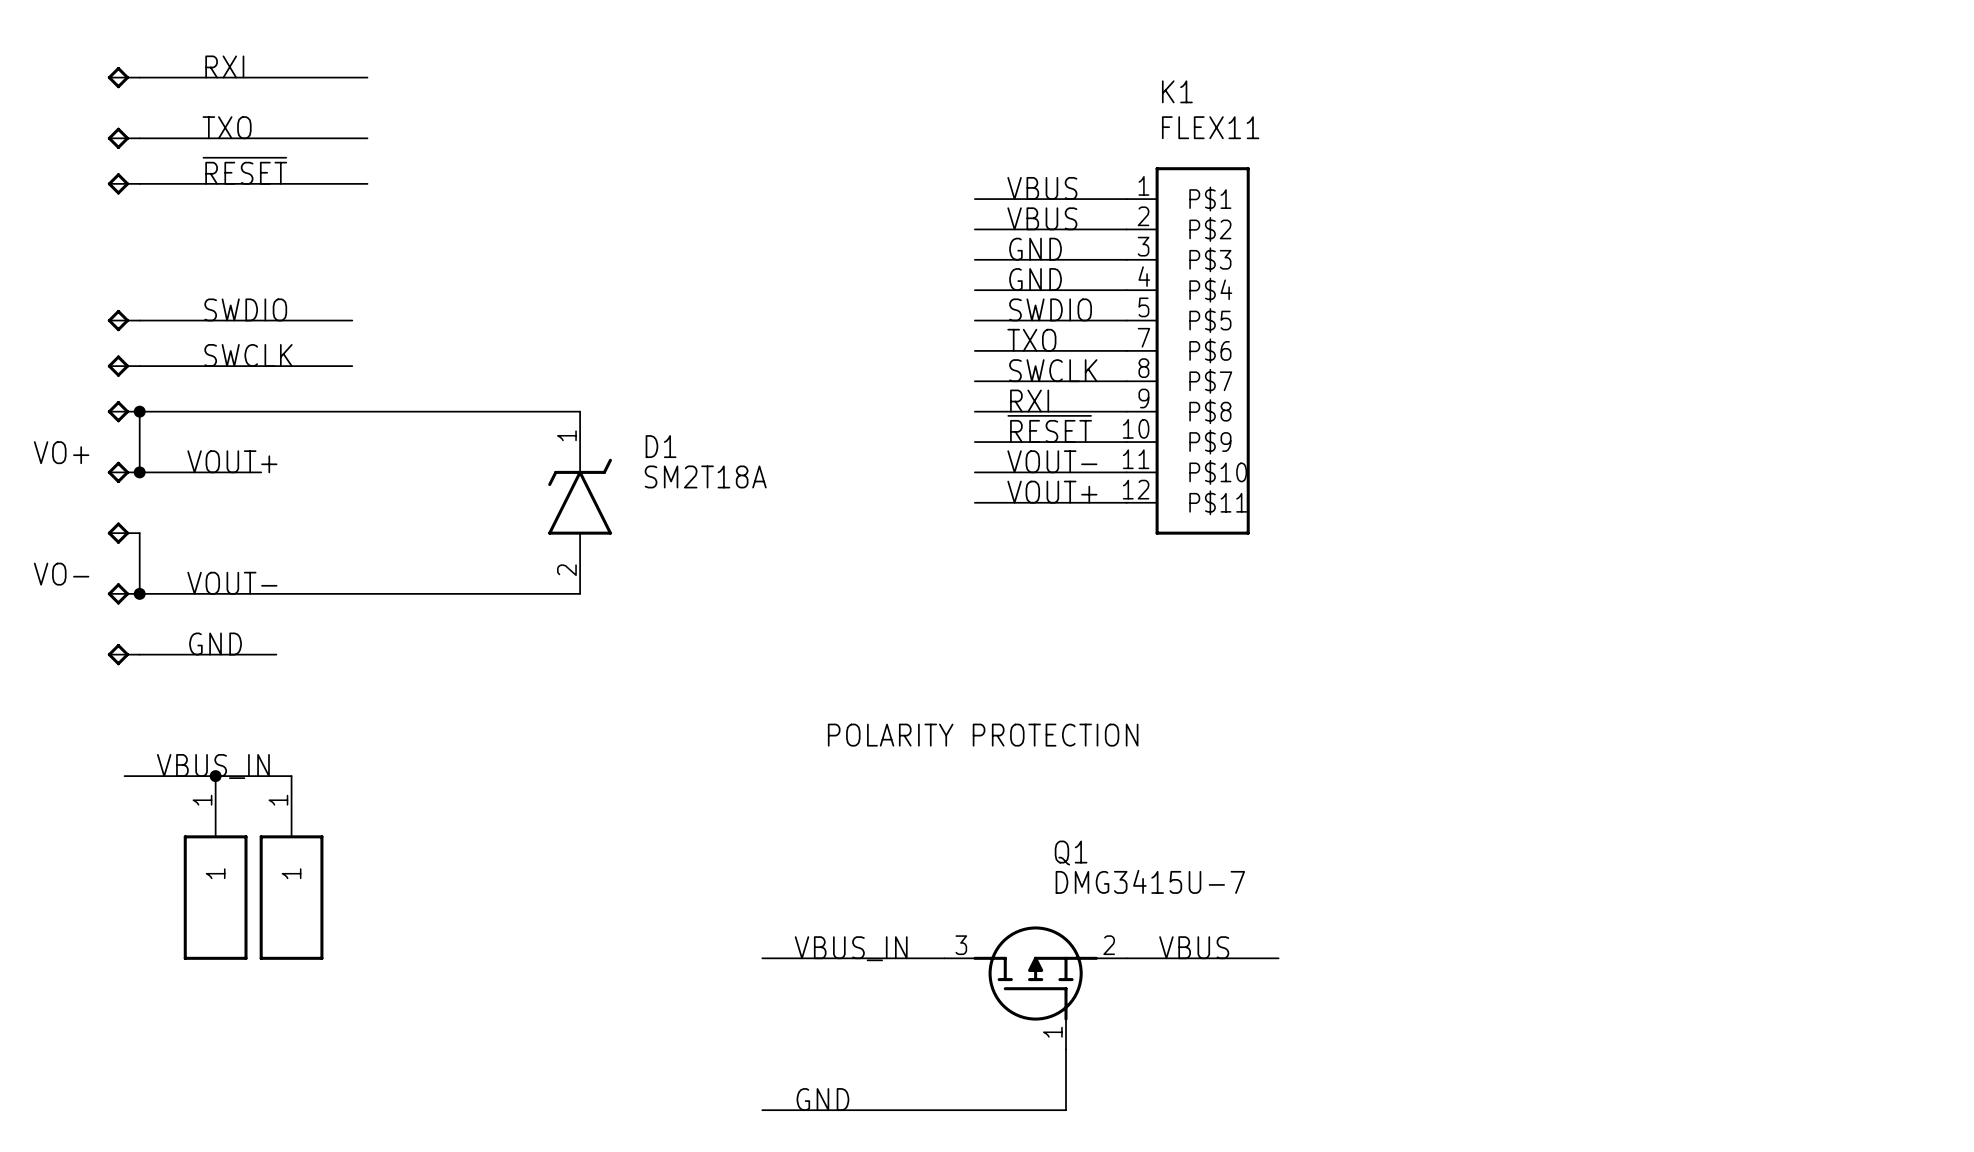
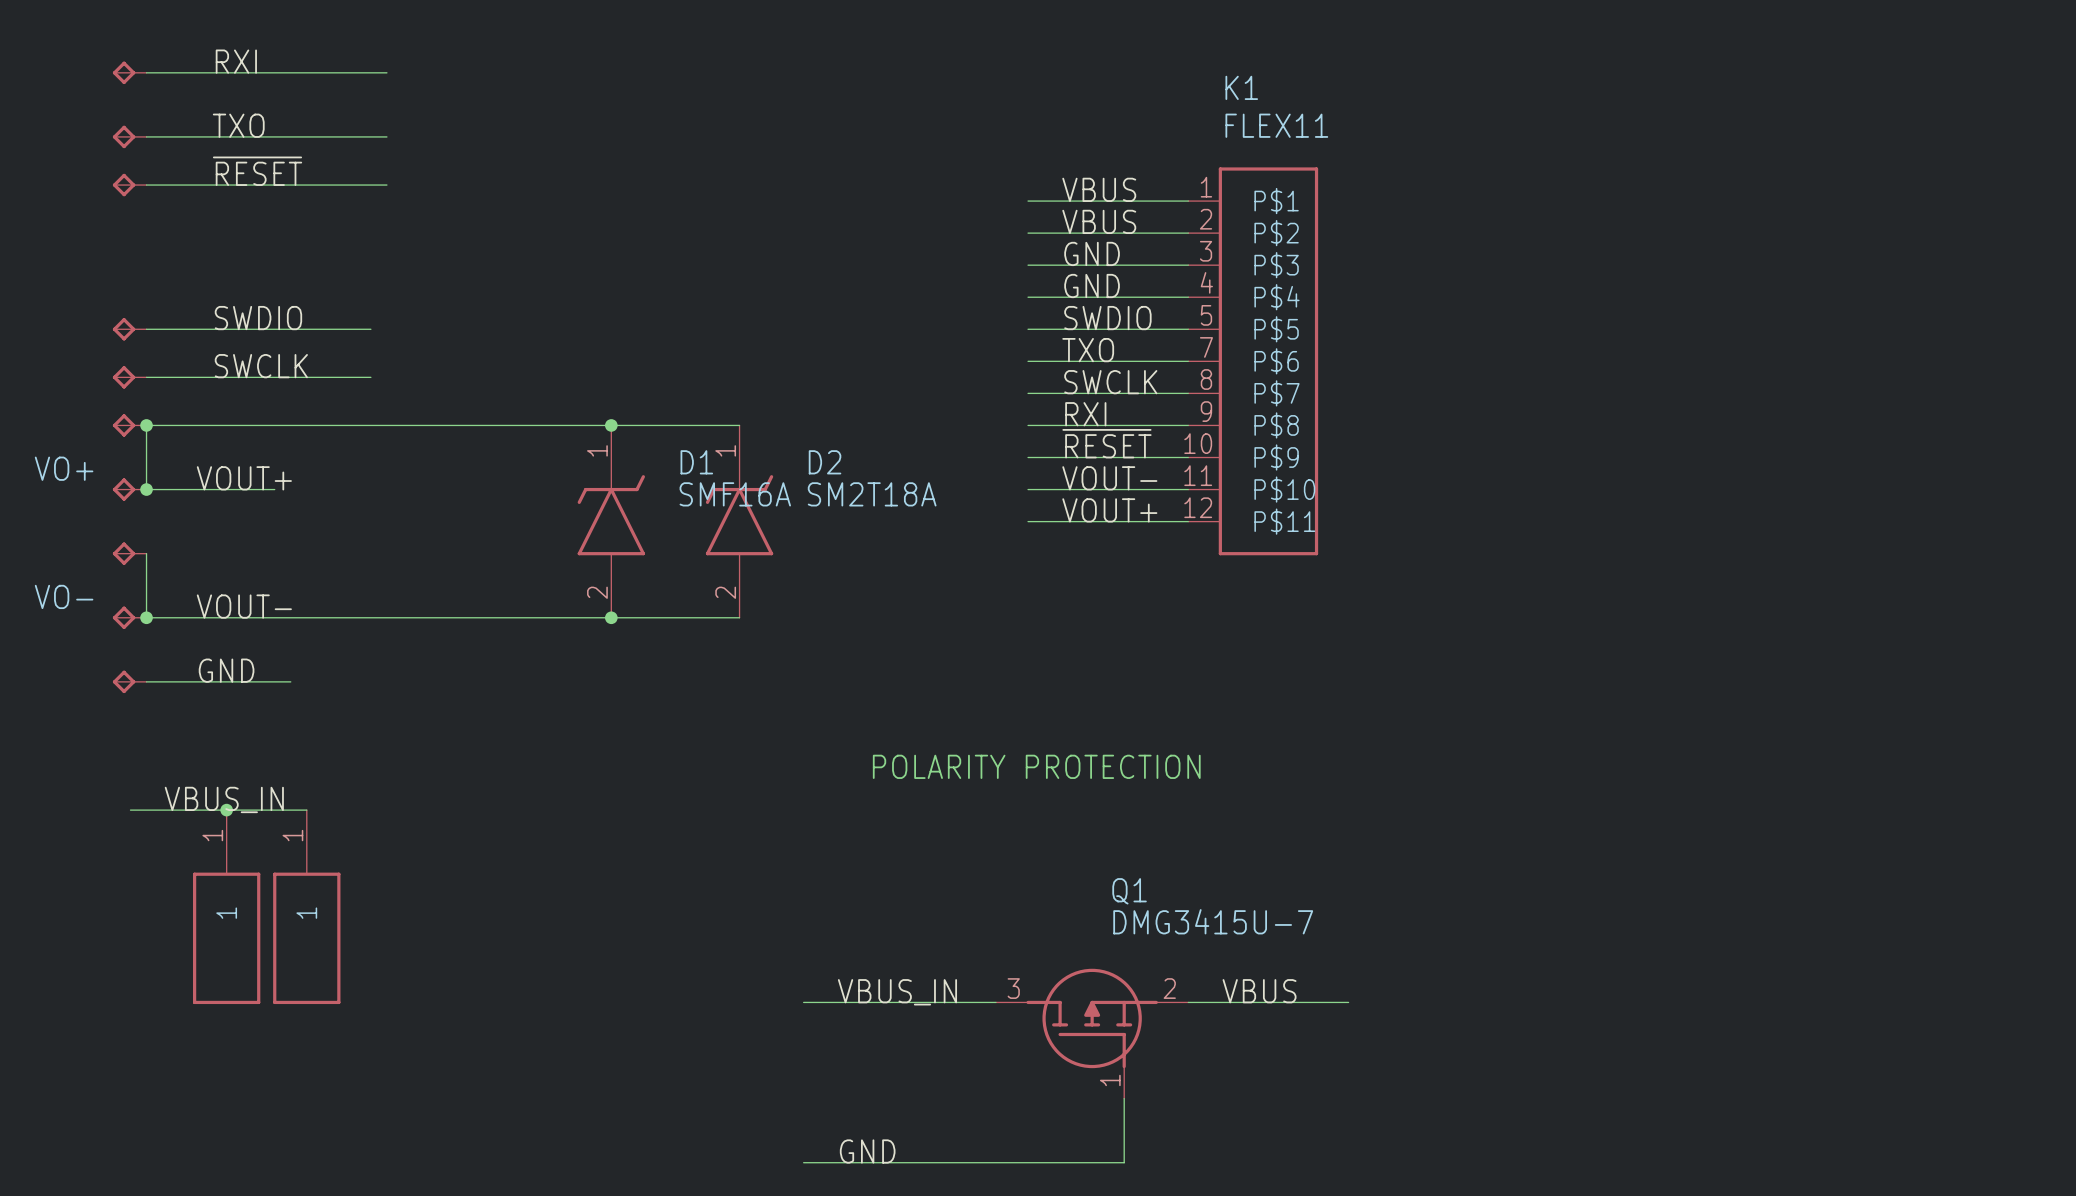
wire: none -> (611, 425) (739, 425)
junction: none -> (611, 425)
D1 value: SM2T18A (705, 476) -> SMF16A (735, 494)
D2: none -> SM2T18A (739, 521)
wire: none -> (611, 617) (739, 617)
junction: none -> (611, 617)

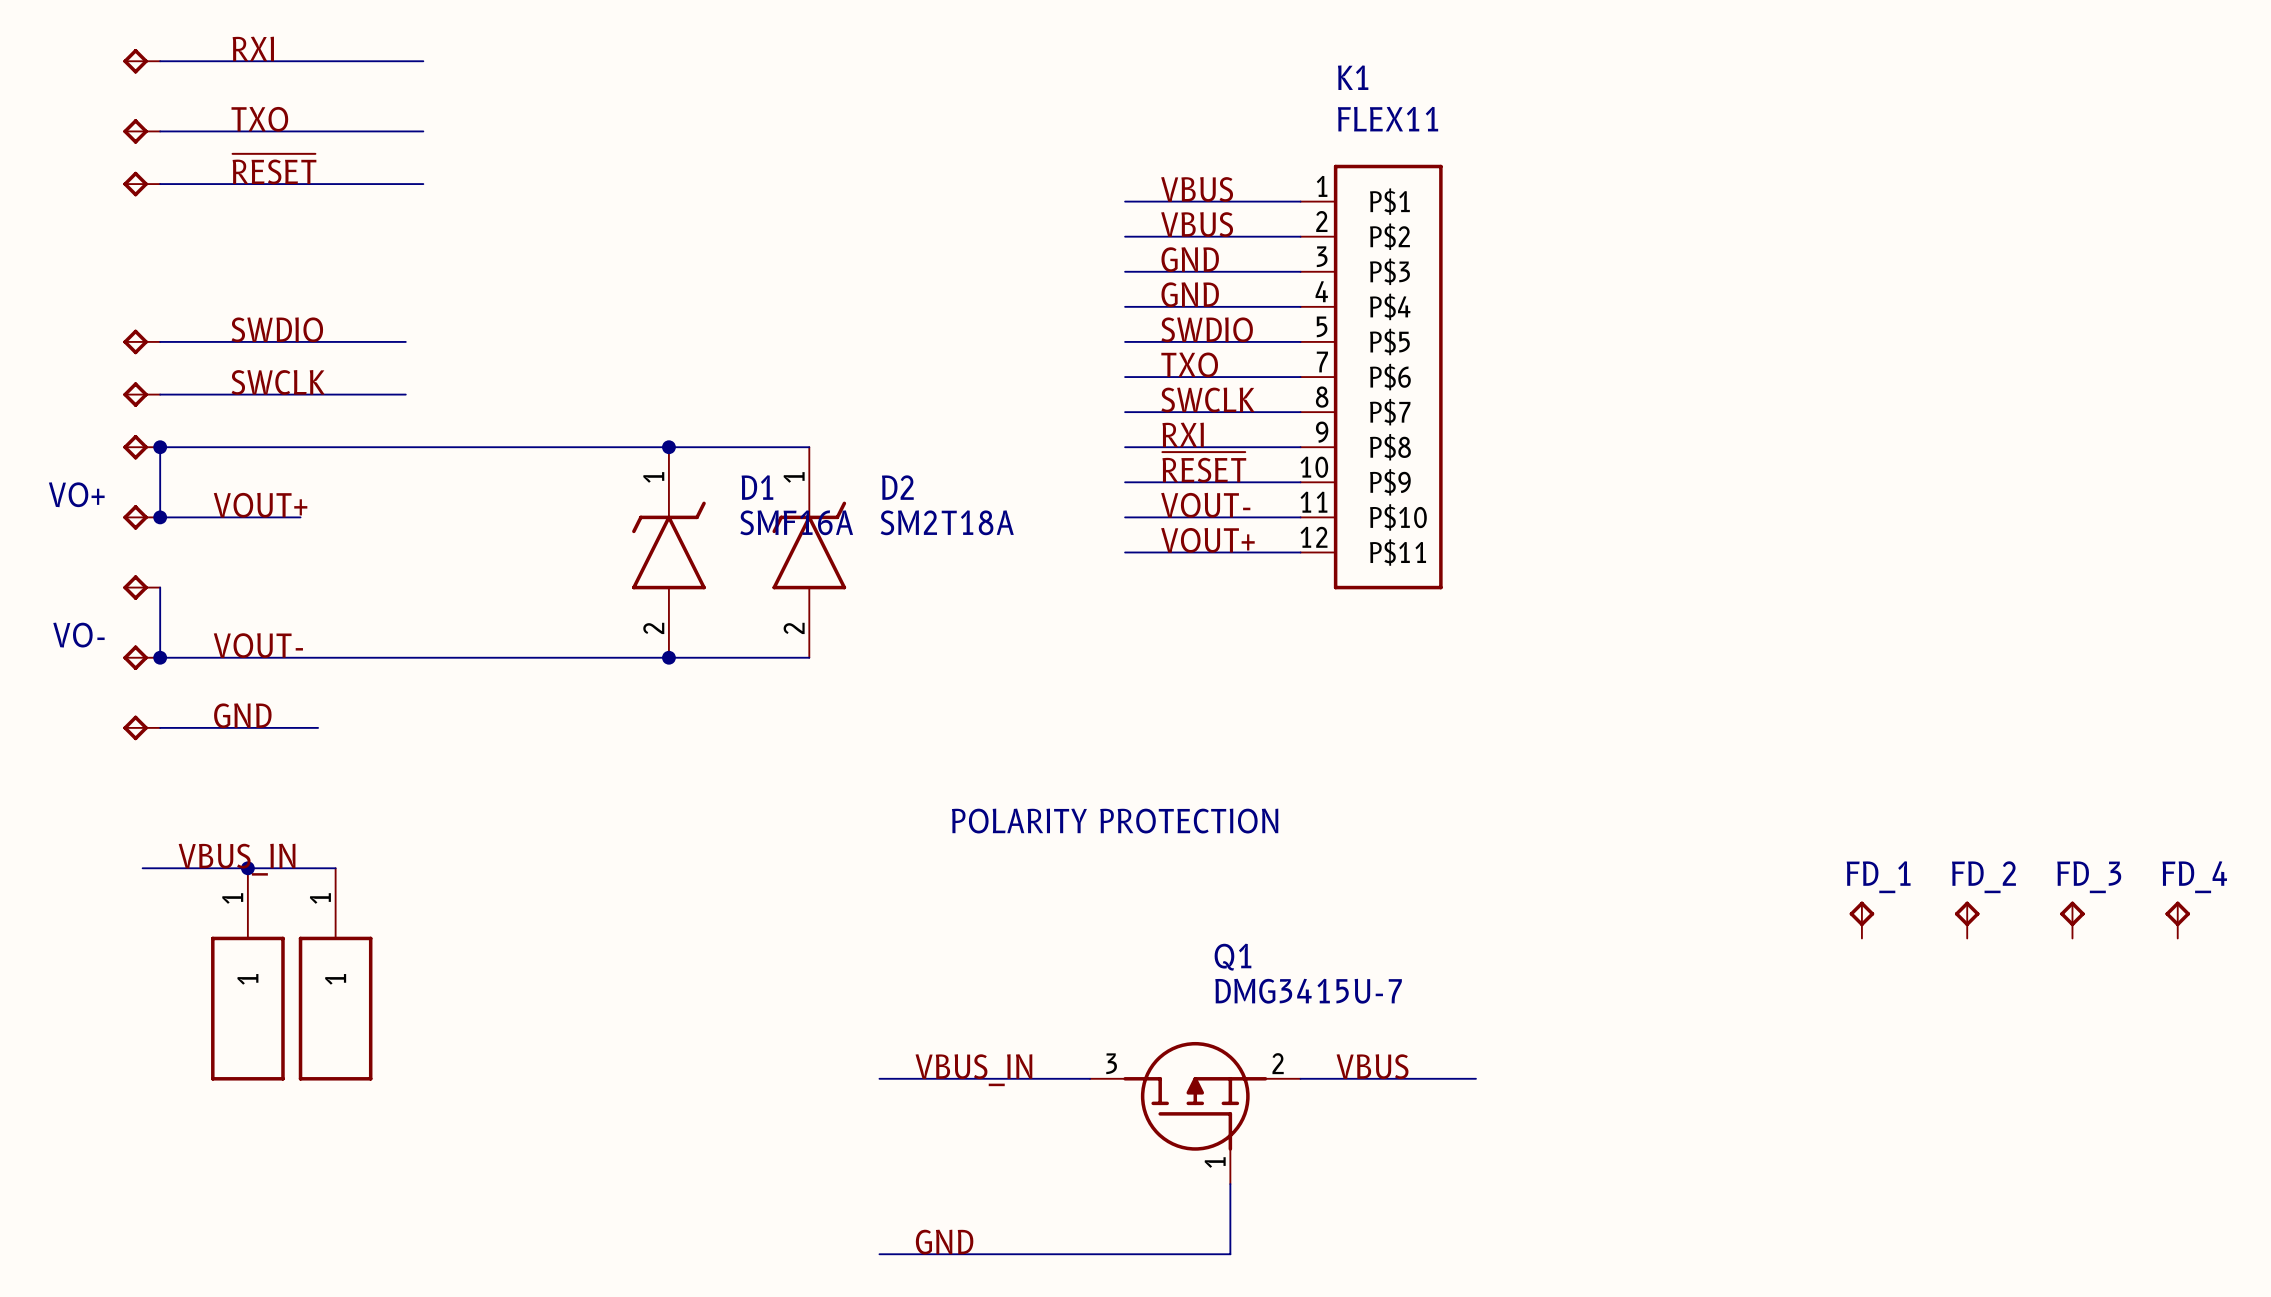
FD_1: none -> (1861, 920)
FD_2: none -> (1967, 920)
FD_3: none -> (2072, 920)
FD_4: none -> (2177, 920)

